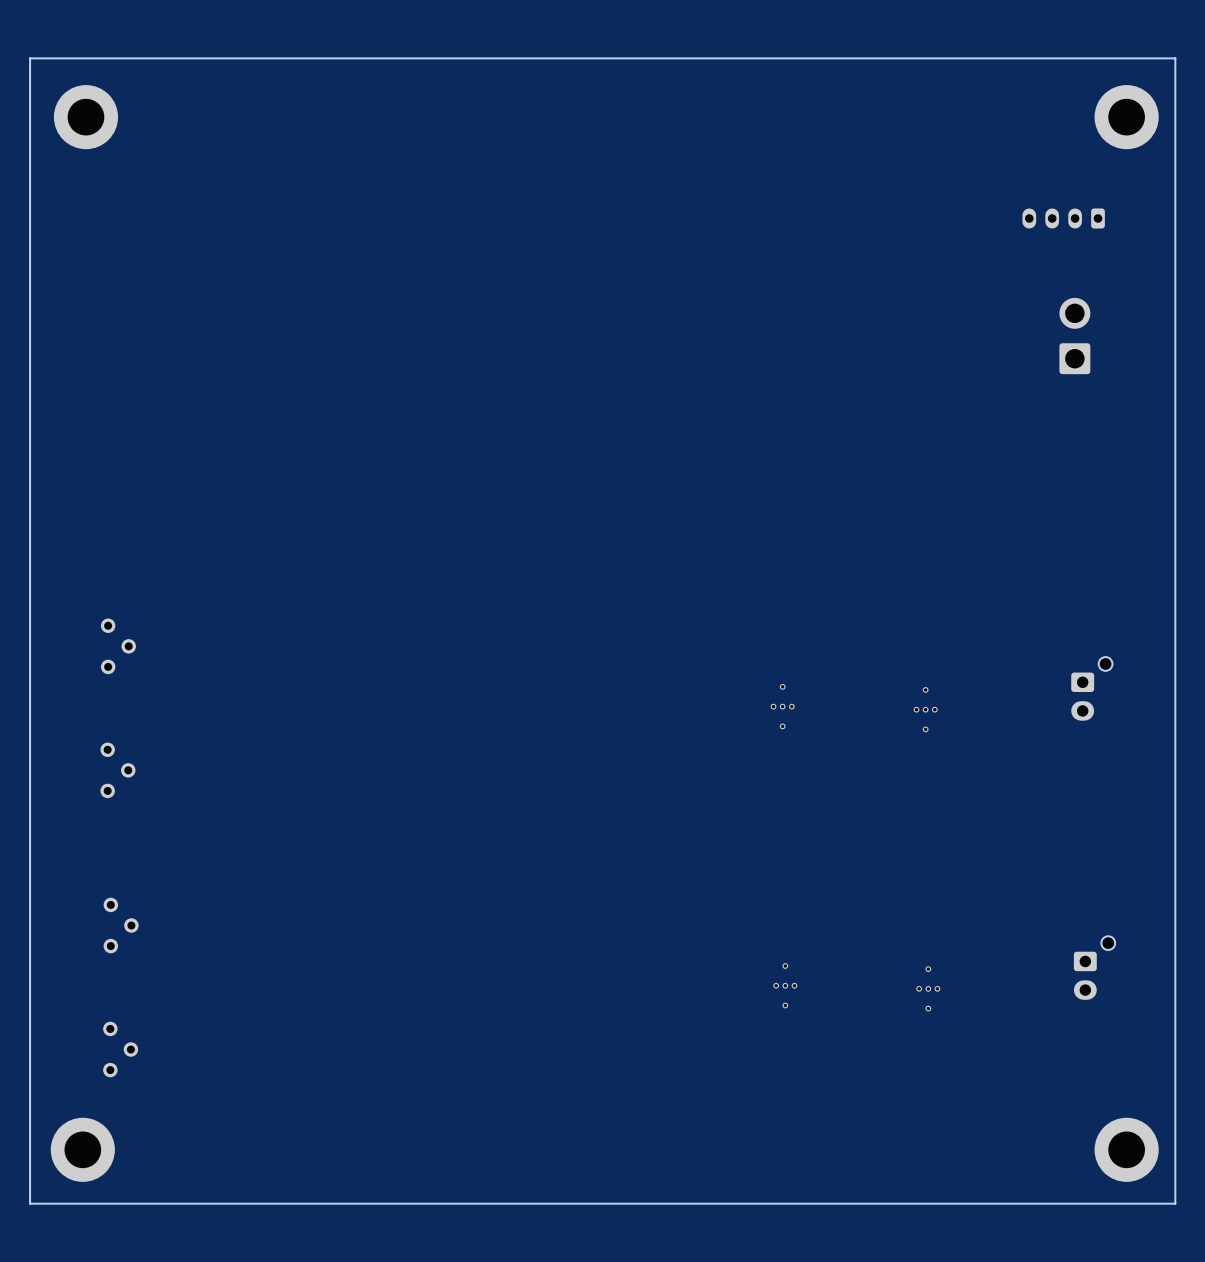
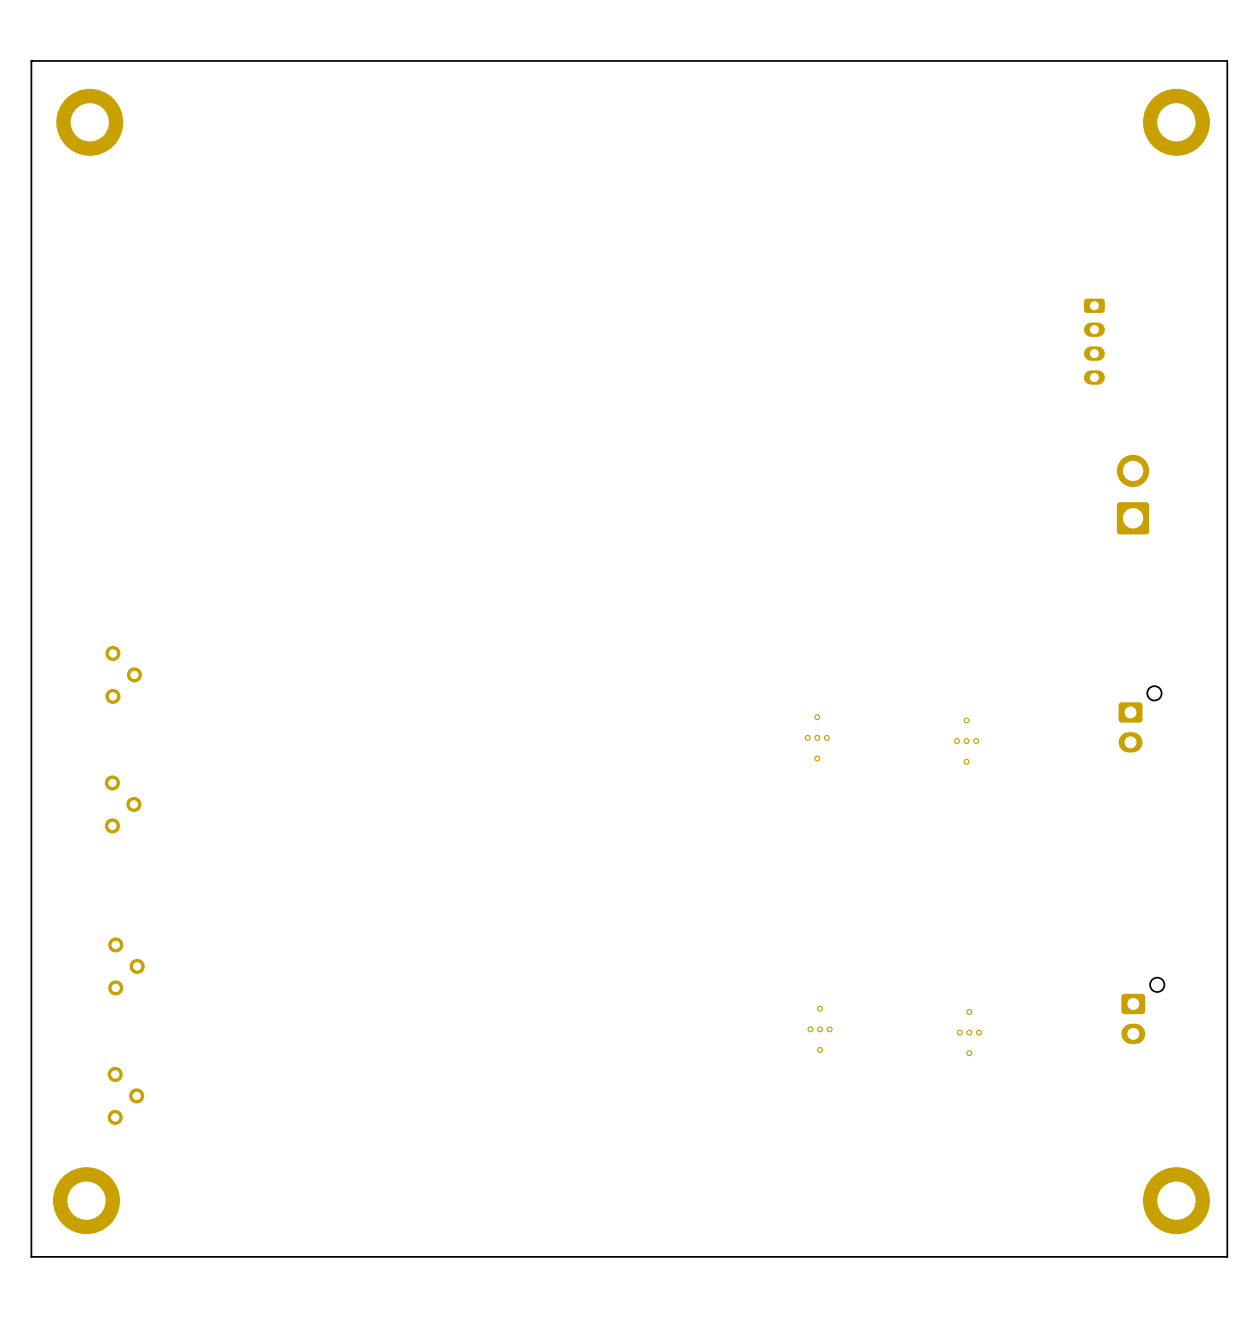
part rotation: 0° (1063, 218) -> 90° counterclockwise (1094, 341)
part position: (1063, 218) -> (1094, 341)
part position: (1074, 336) -> (1133, 494)

